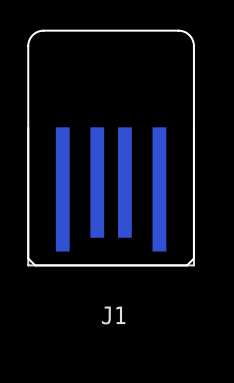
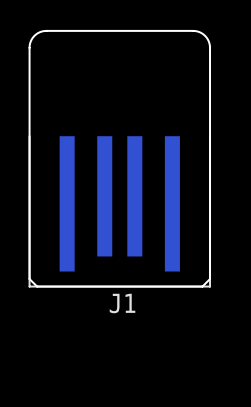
J1 name position: J1 (113, 315) -> J1 (122, 303)

